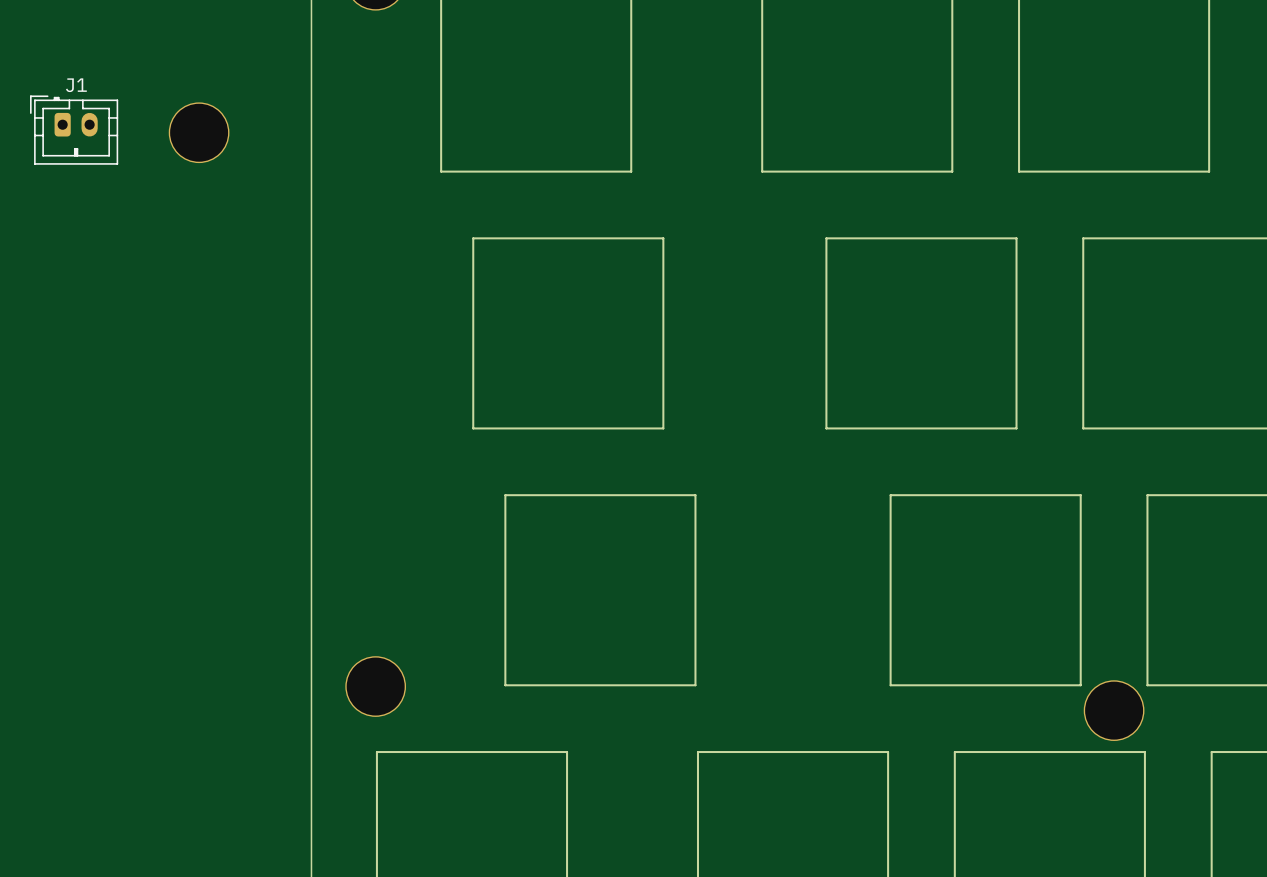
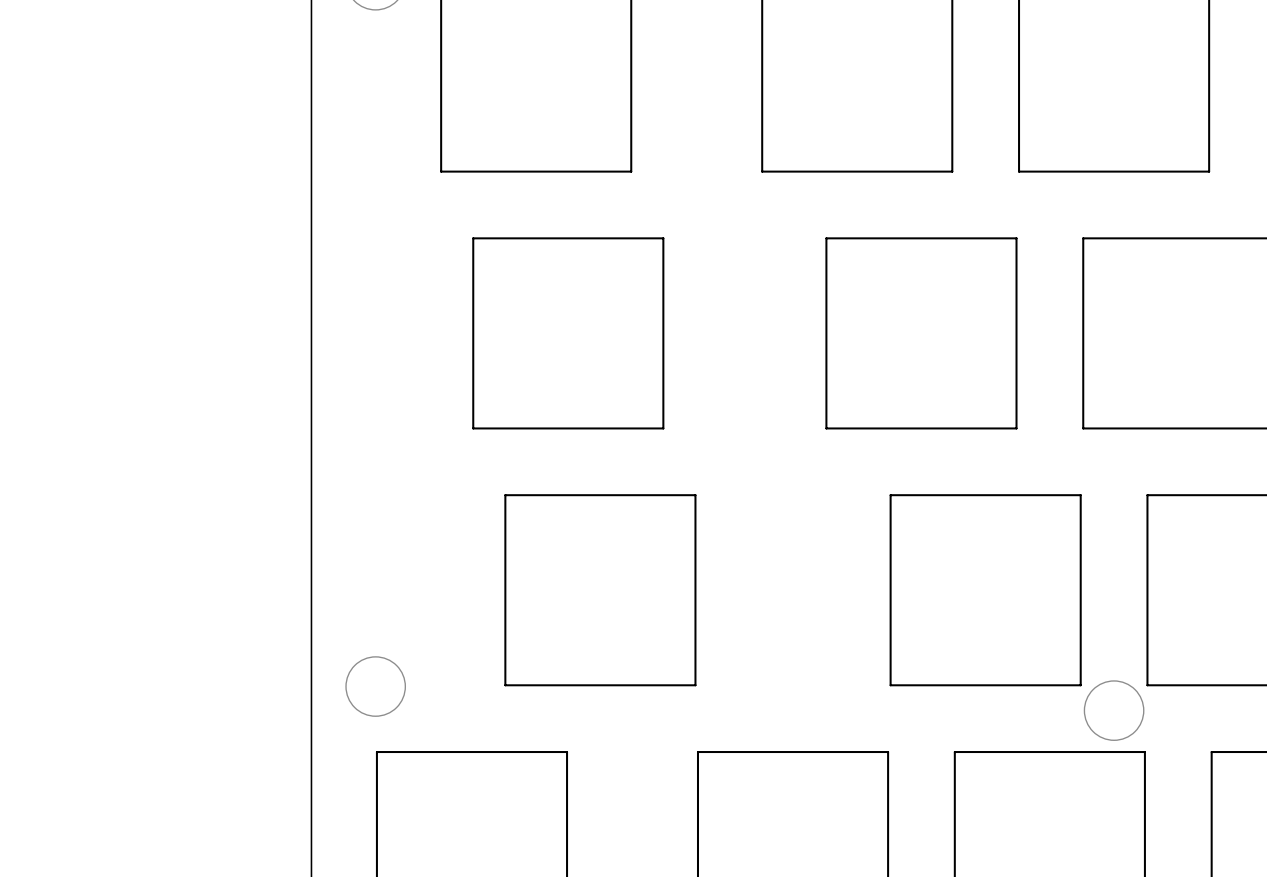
J1: (74, 130) -> none
part: (199, 132) -> none

